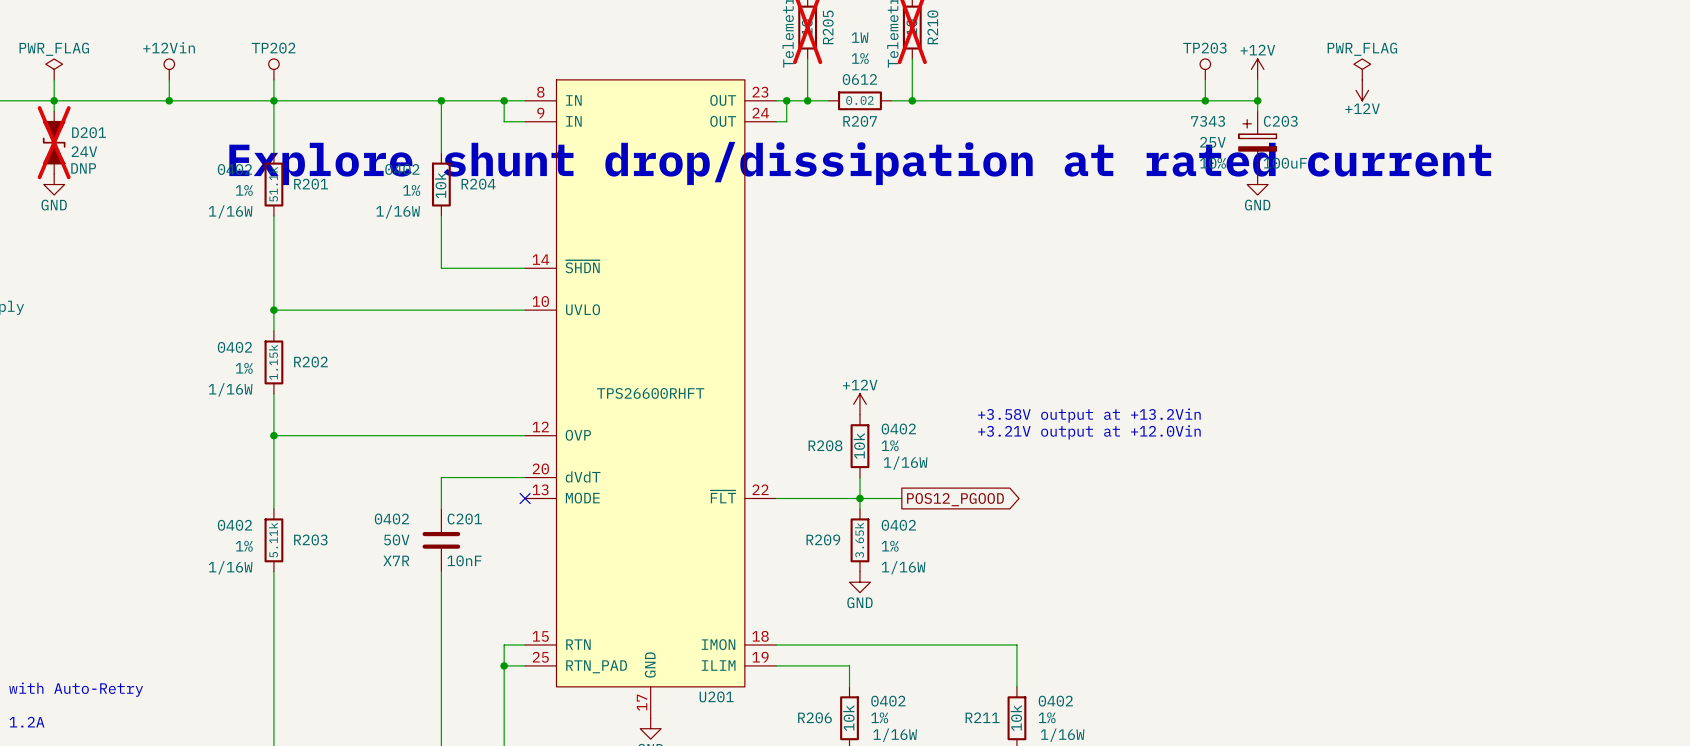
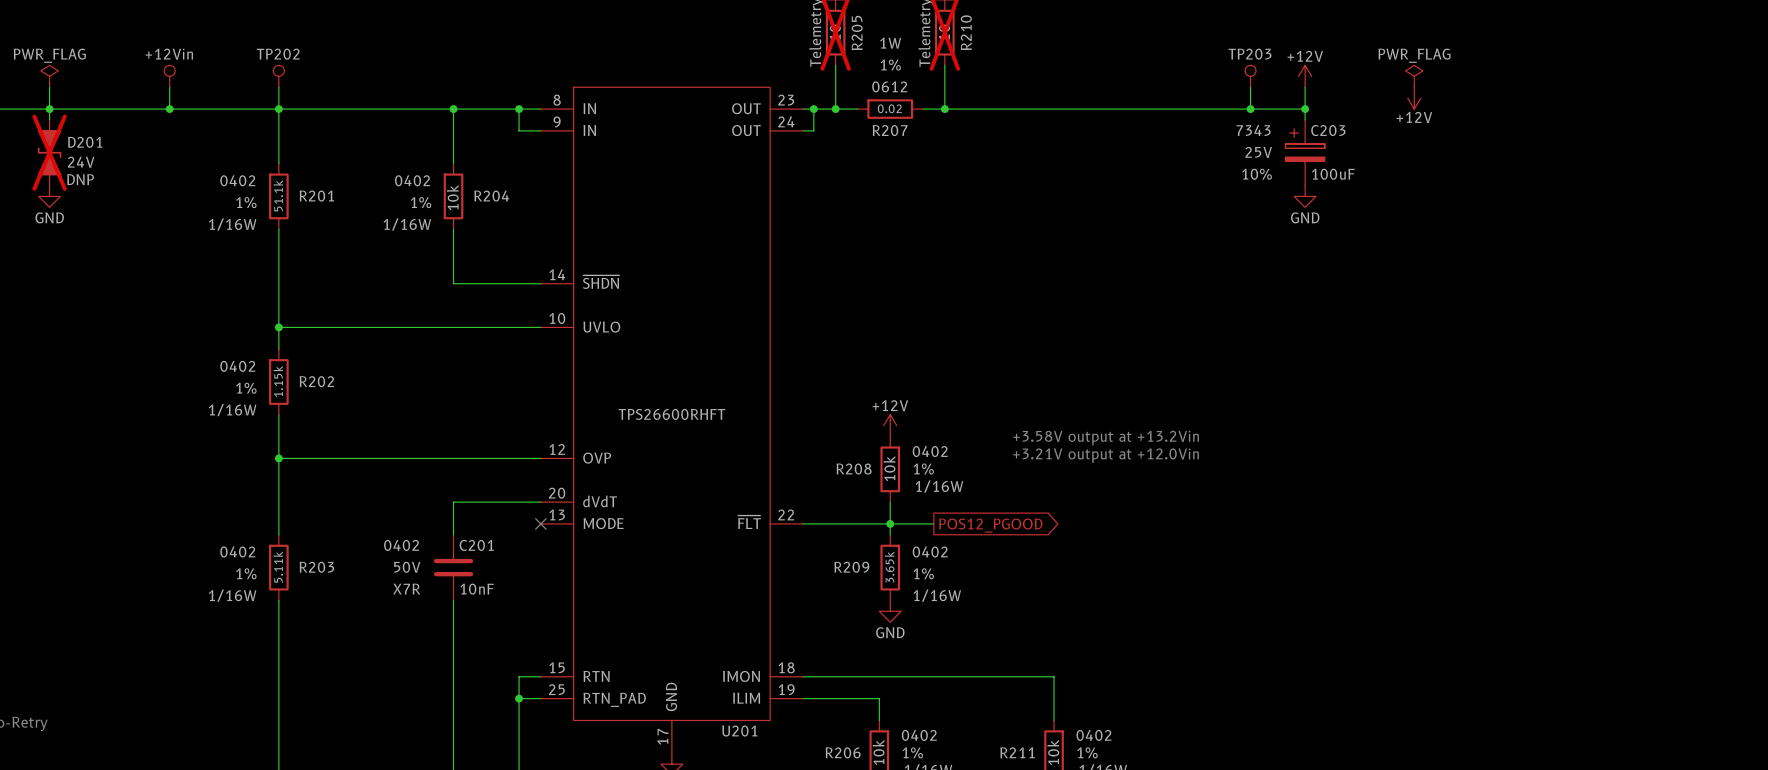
text: Explore shunt drop/dissipation at rated current (860, 163) -> none

